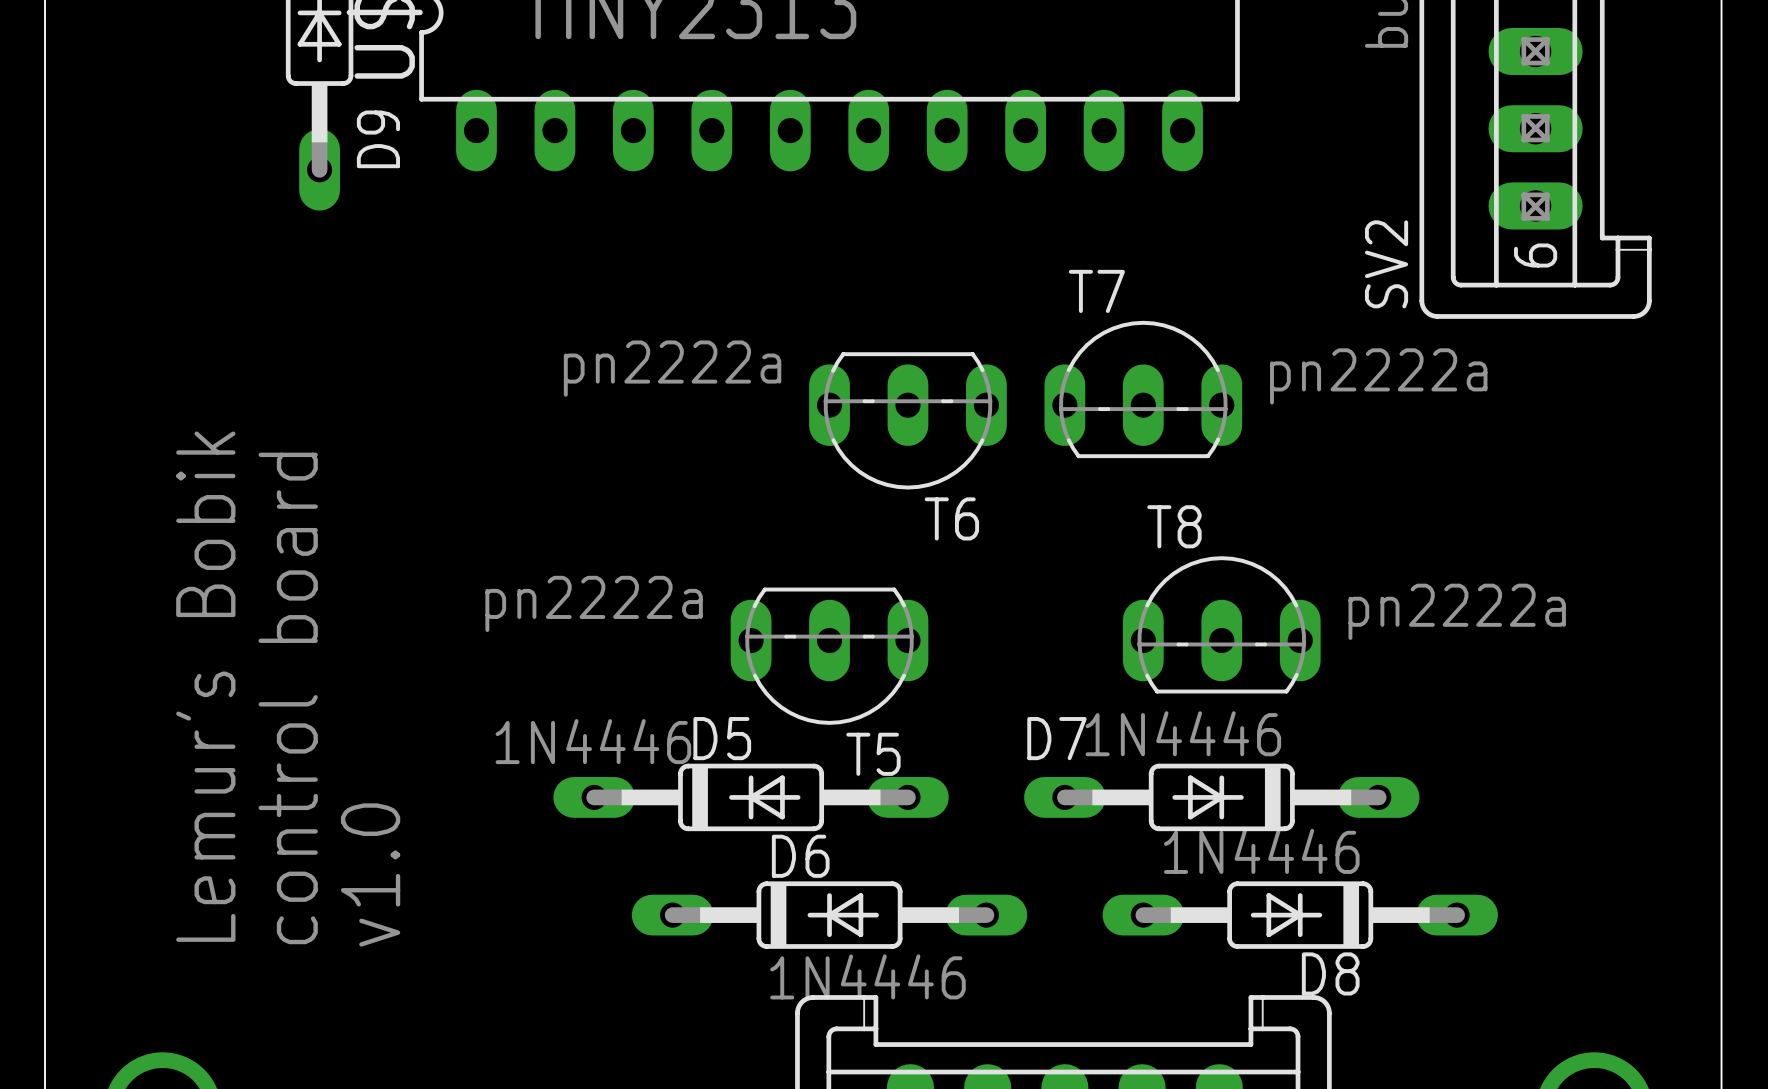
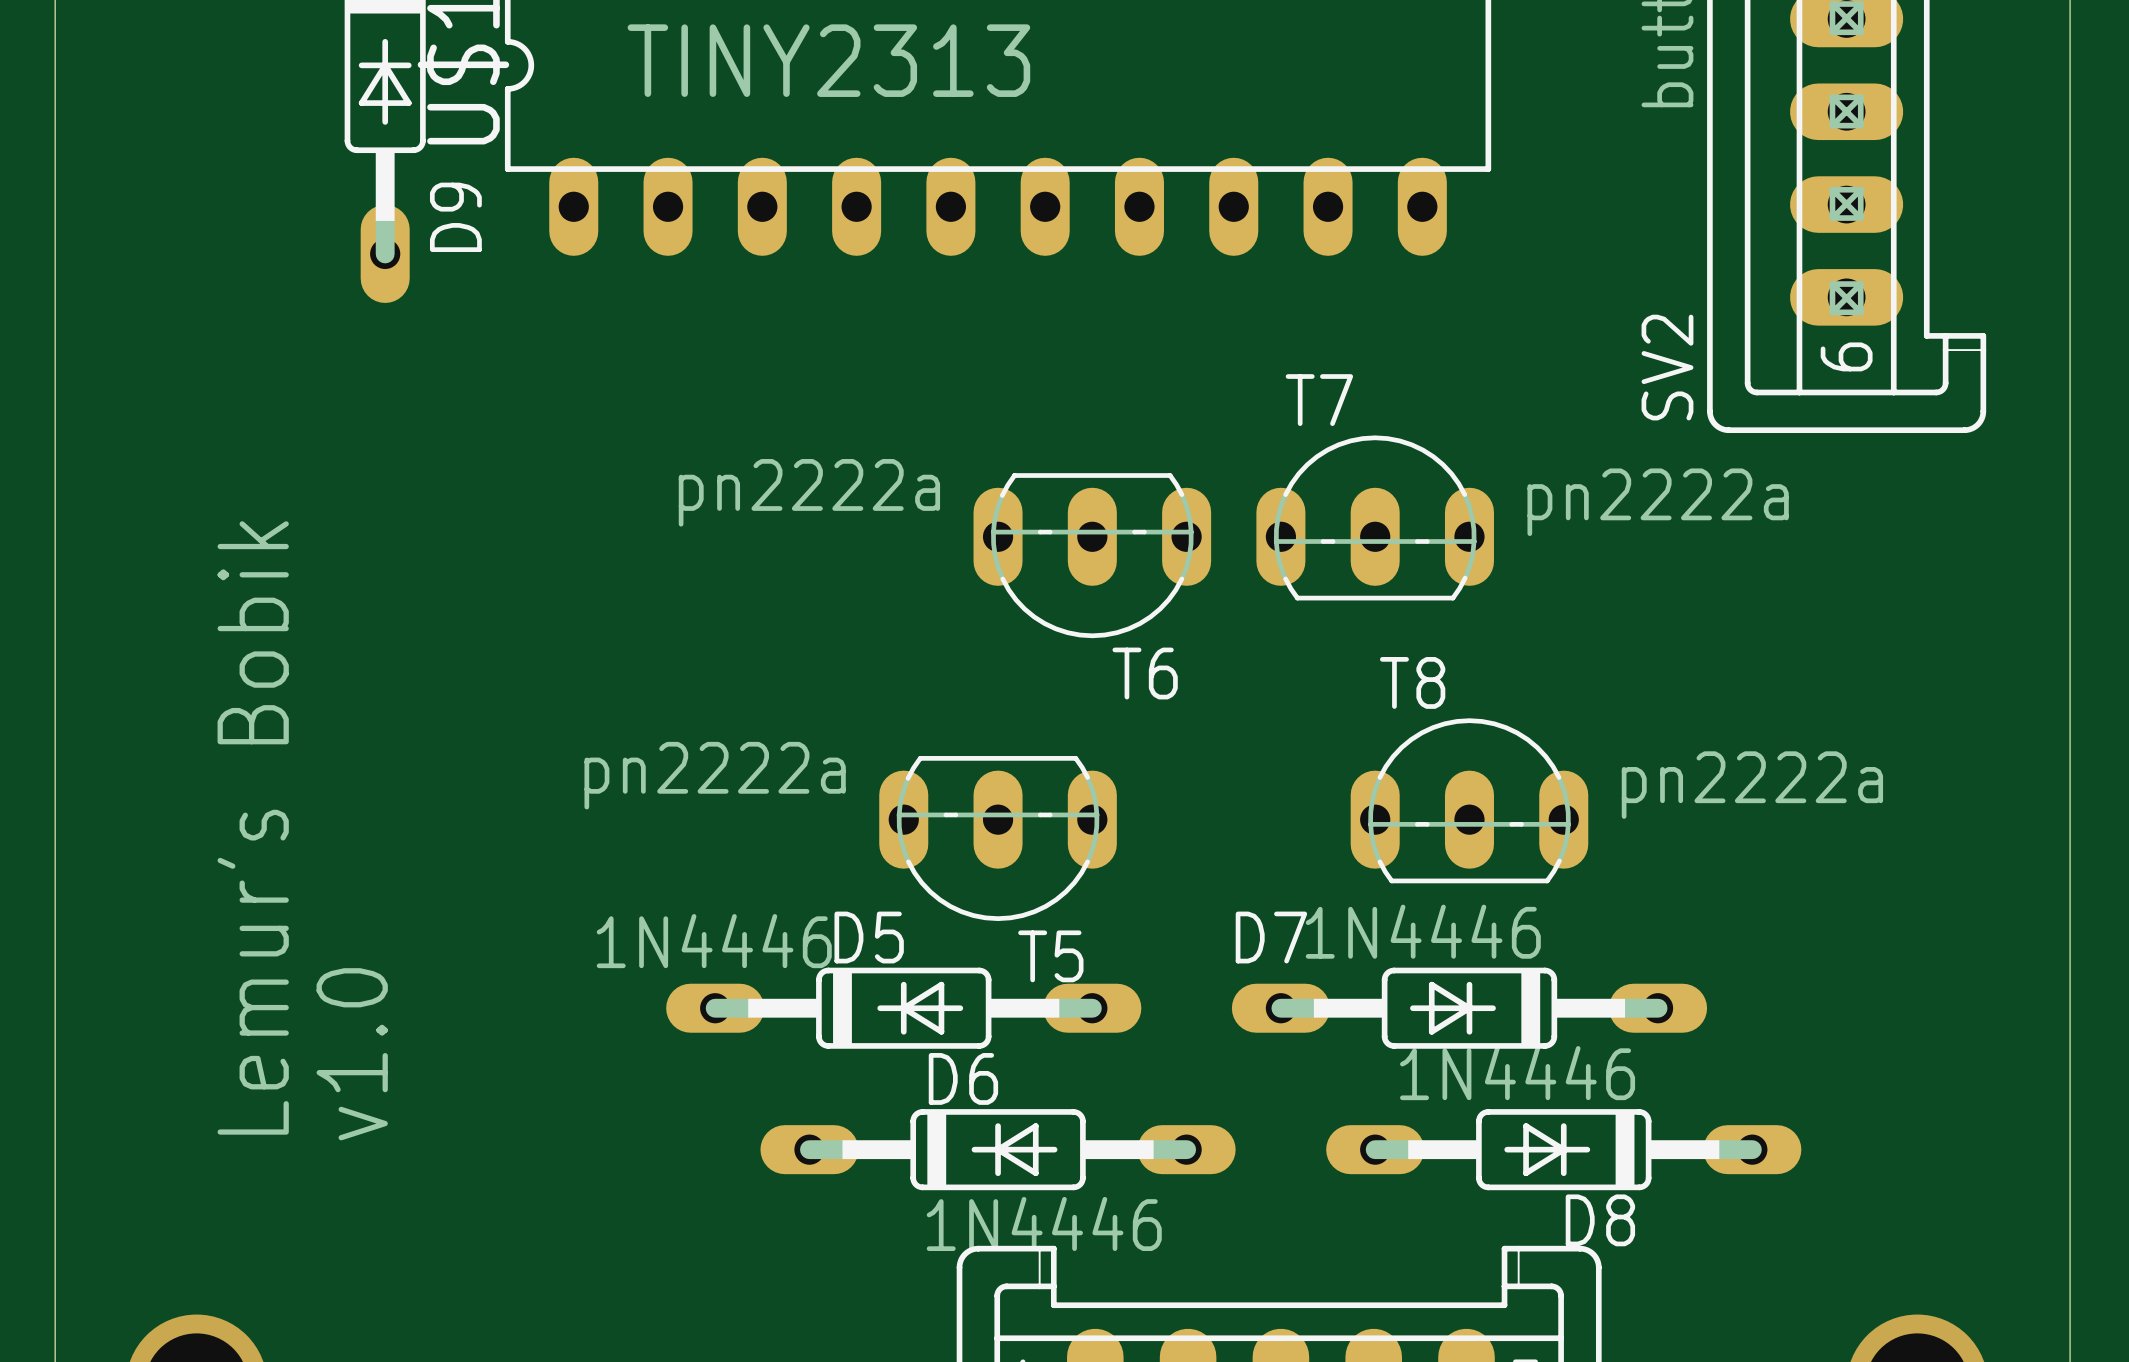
text position: Lemur's Bobik (205, 686) -> Lemur's Bobik (253, 827)
text: control board (288, 698) -> none
text position: v1.0 (370, 874) -> v1.0 (352, 1054)

